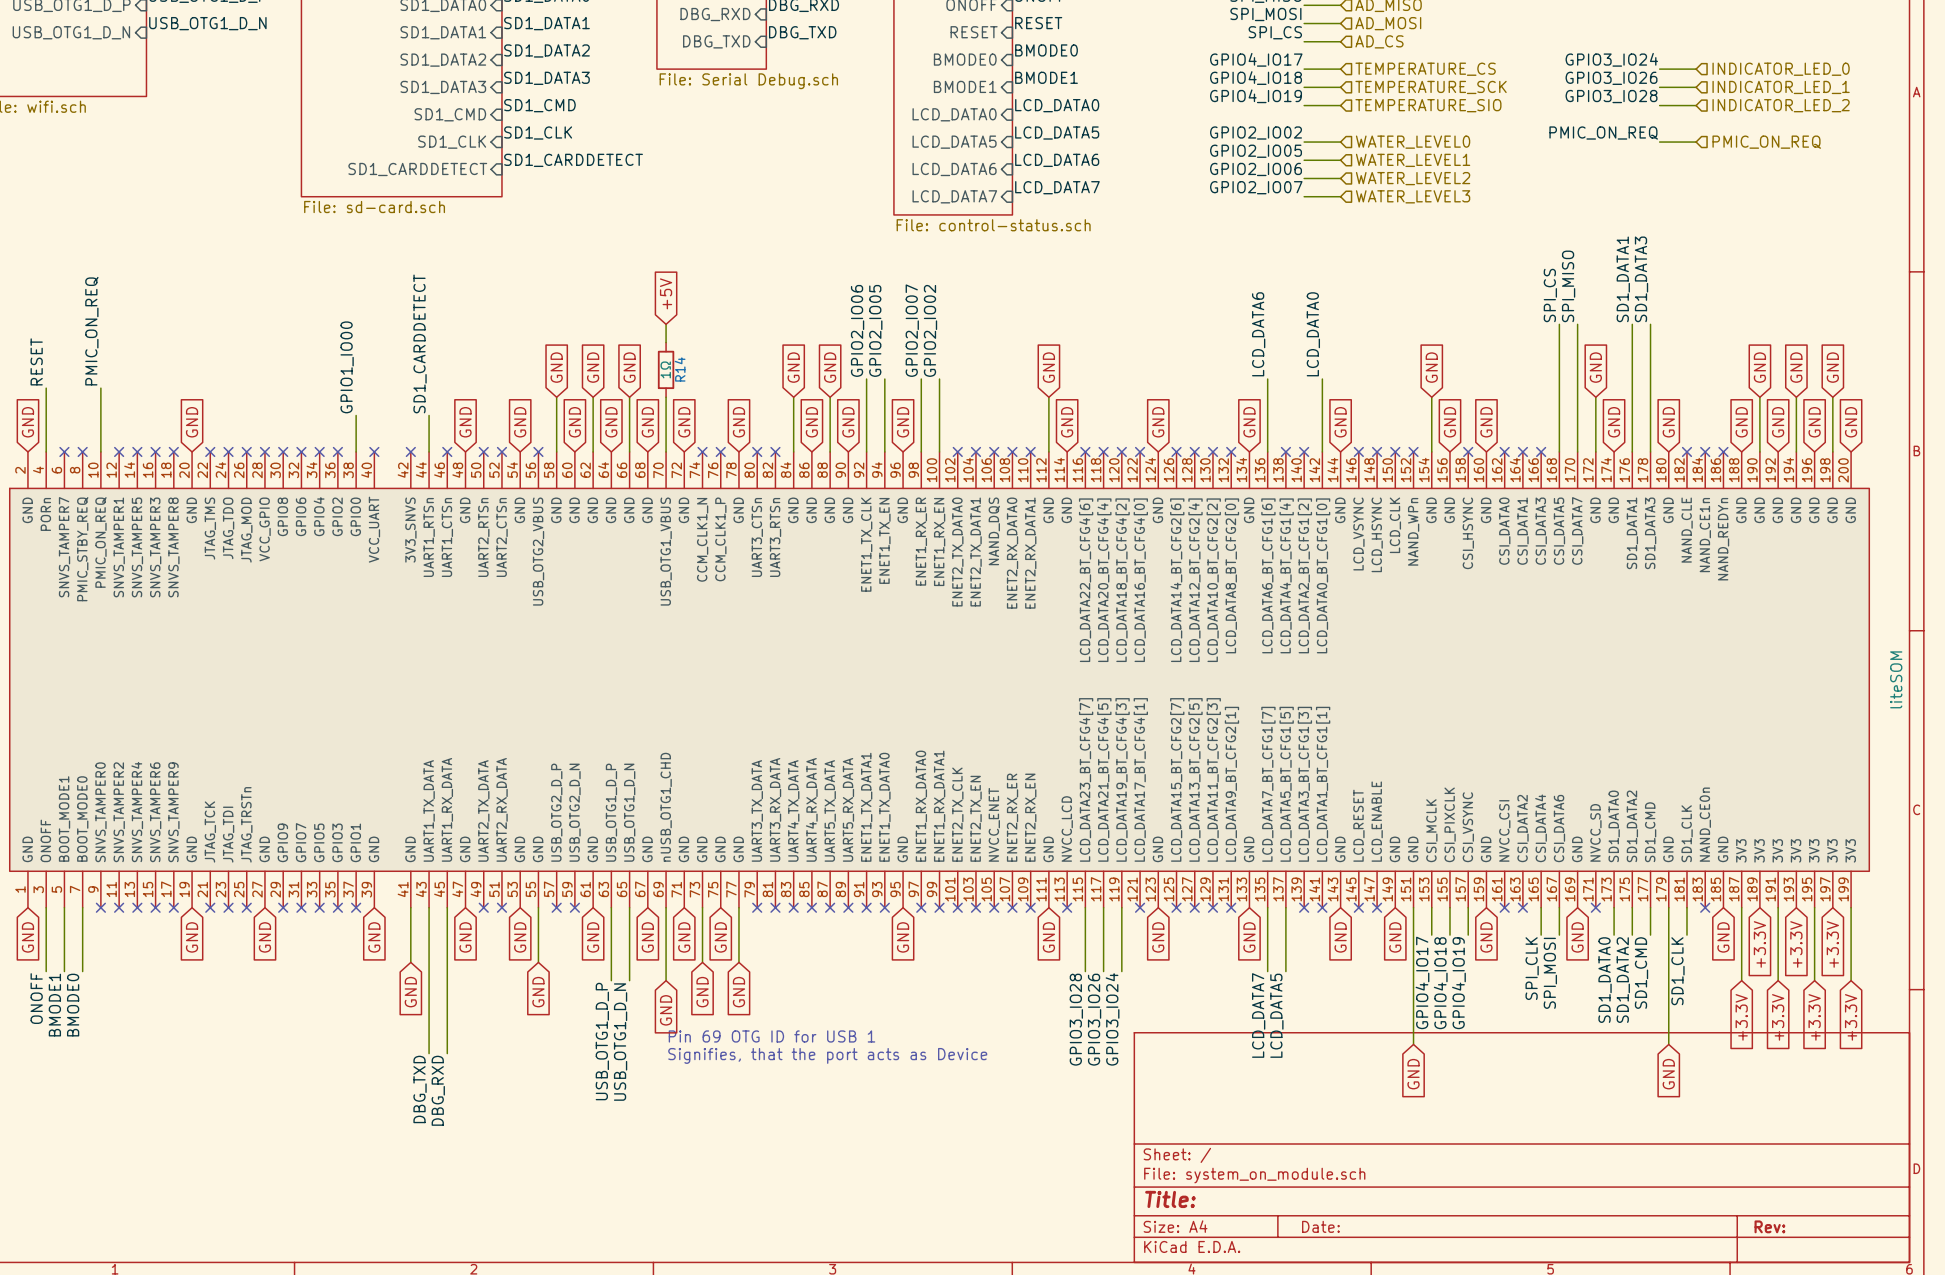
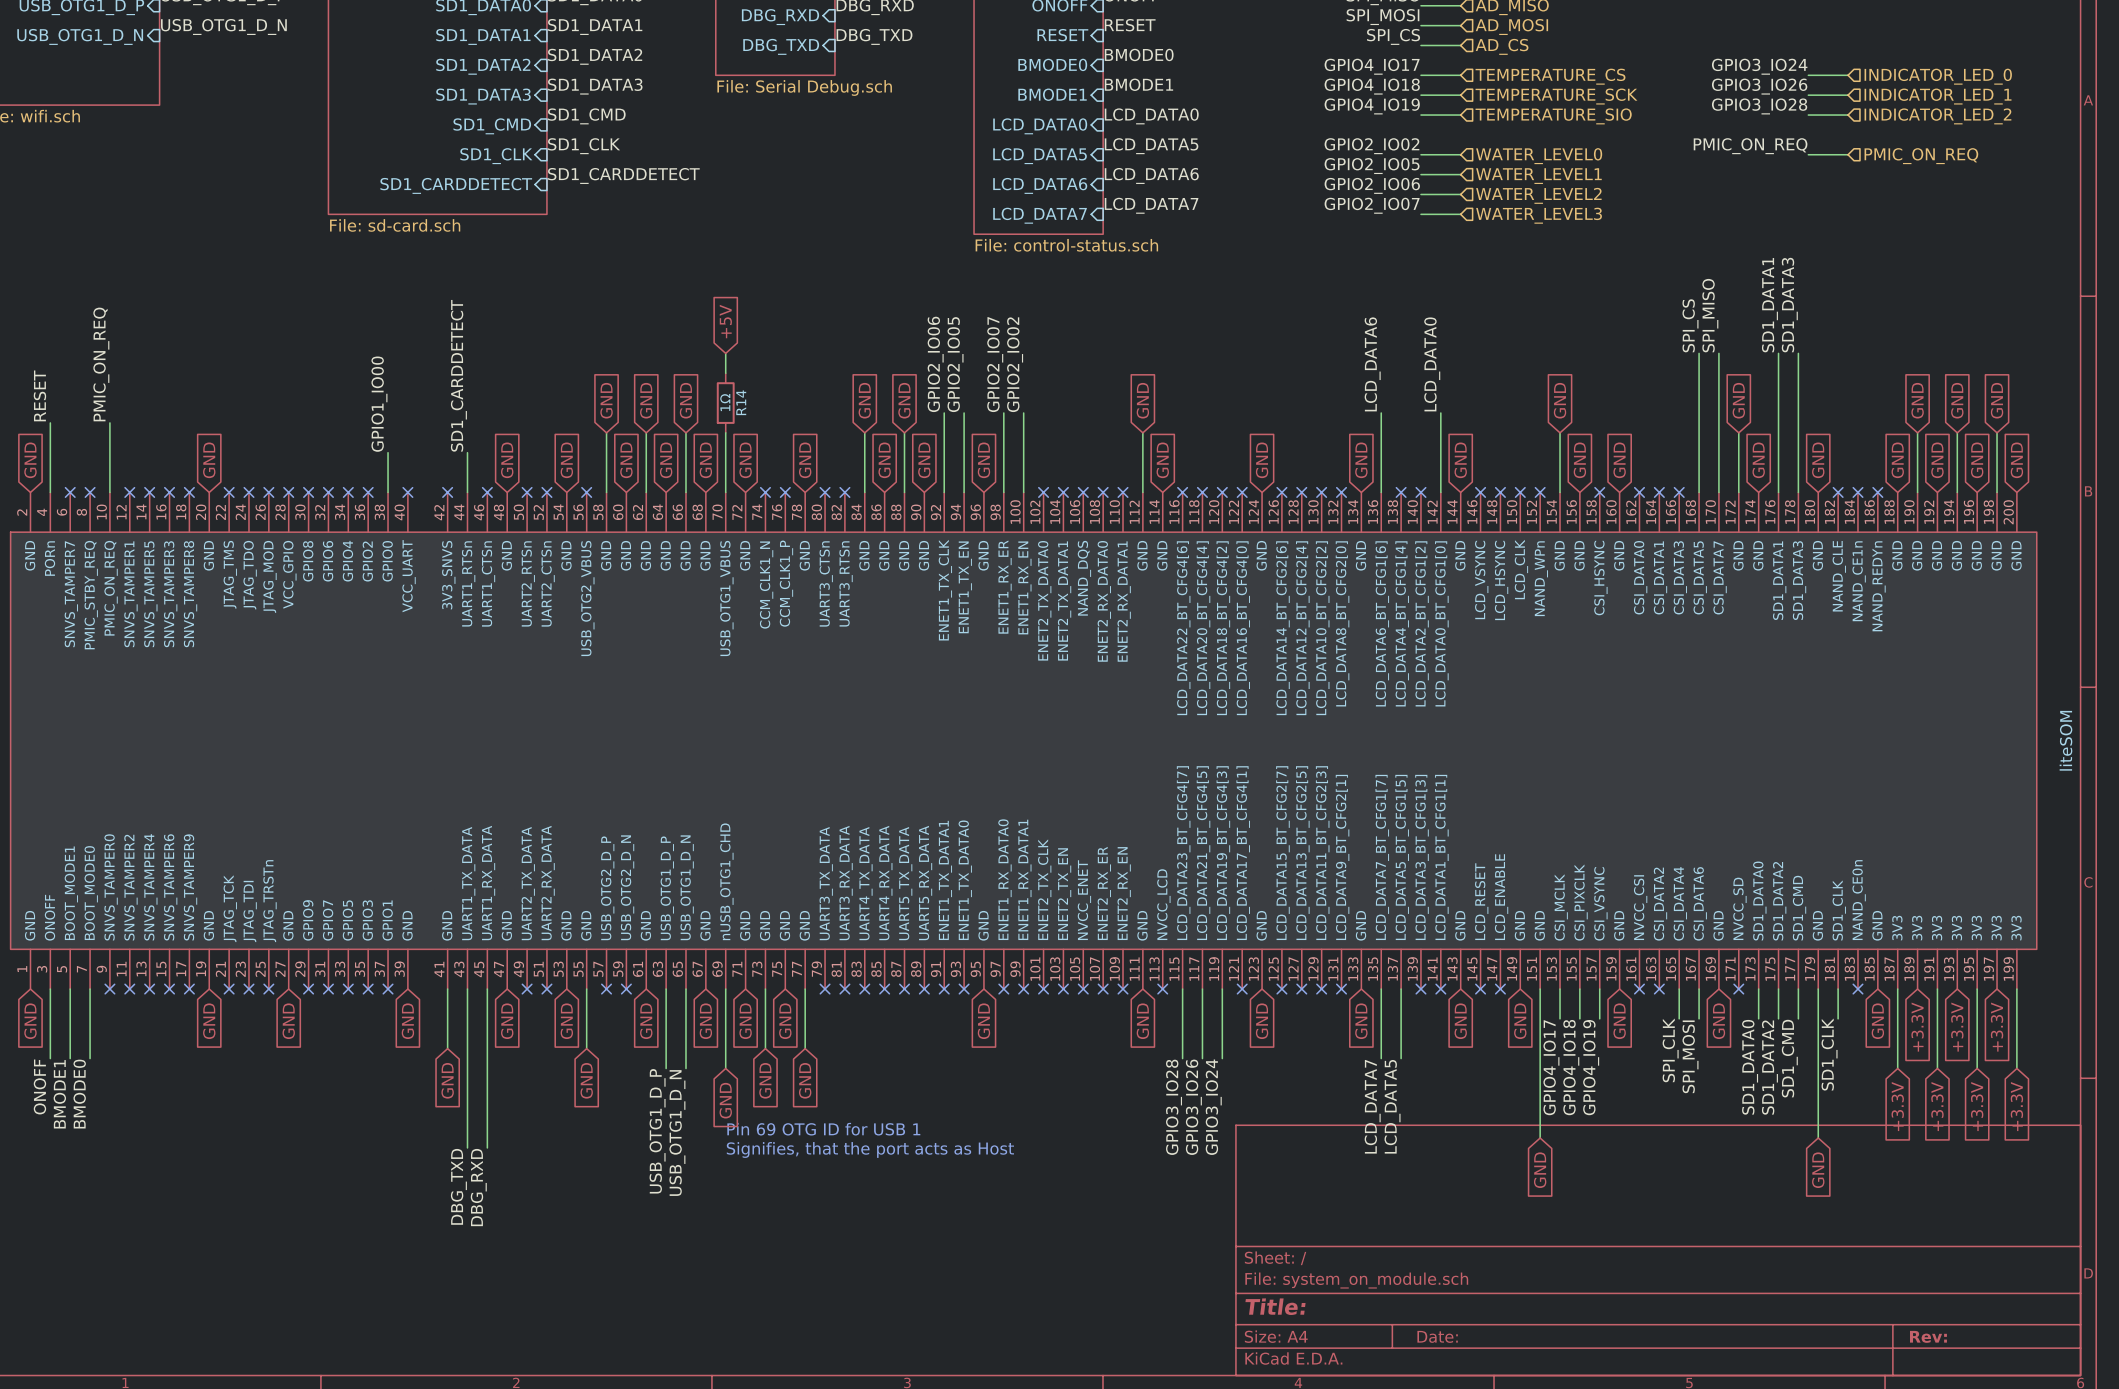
text: Signifies, that the port acts as Device (827, 1055) -> Signifies, that the port acts as Host (870, 1149)

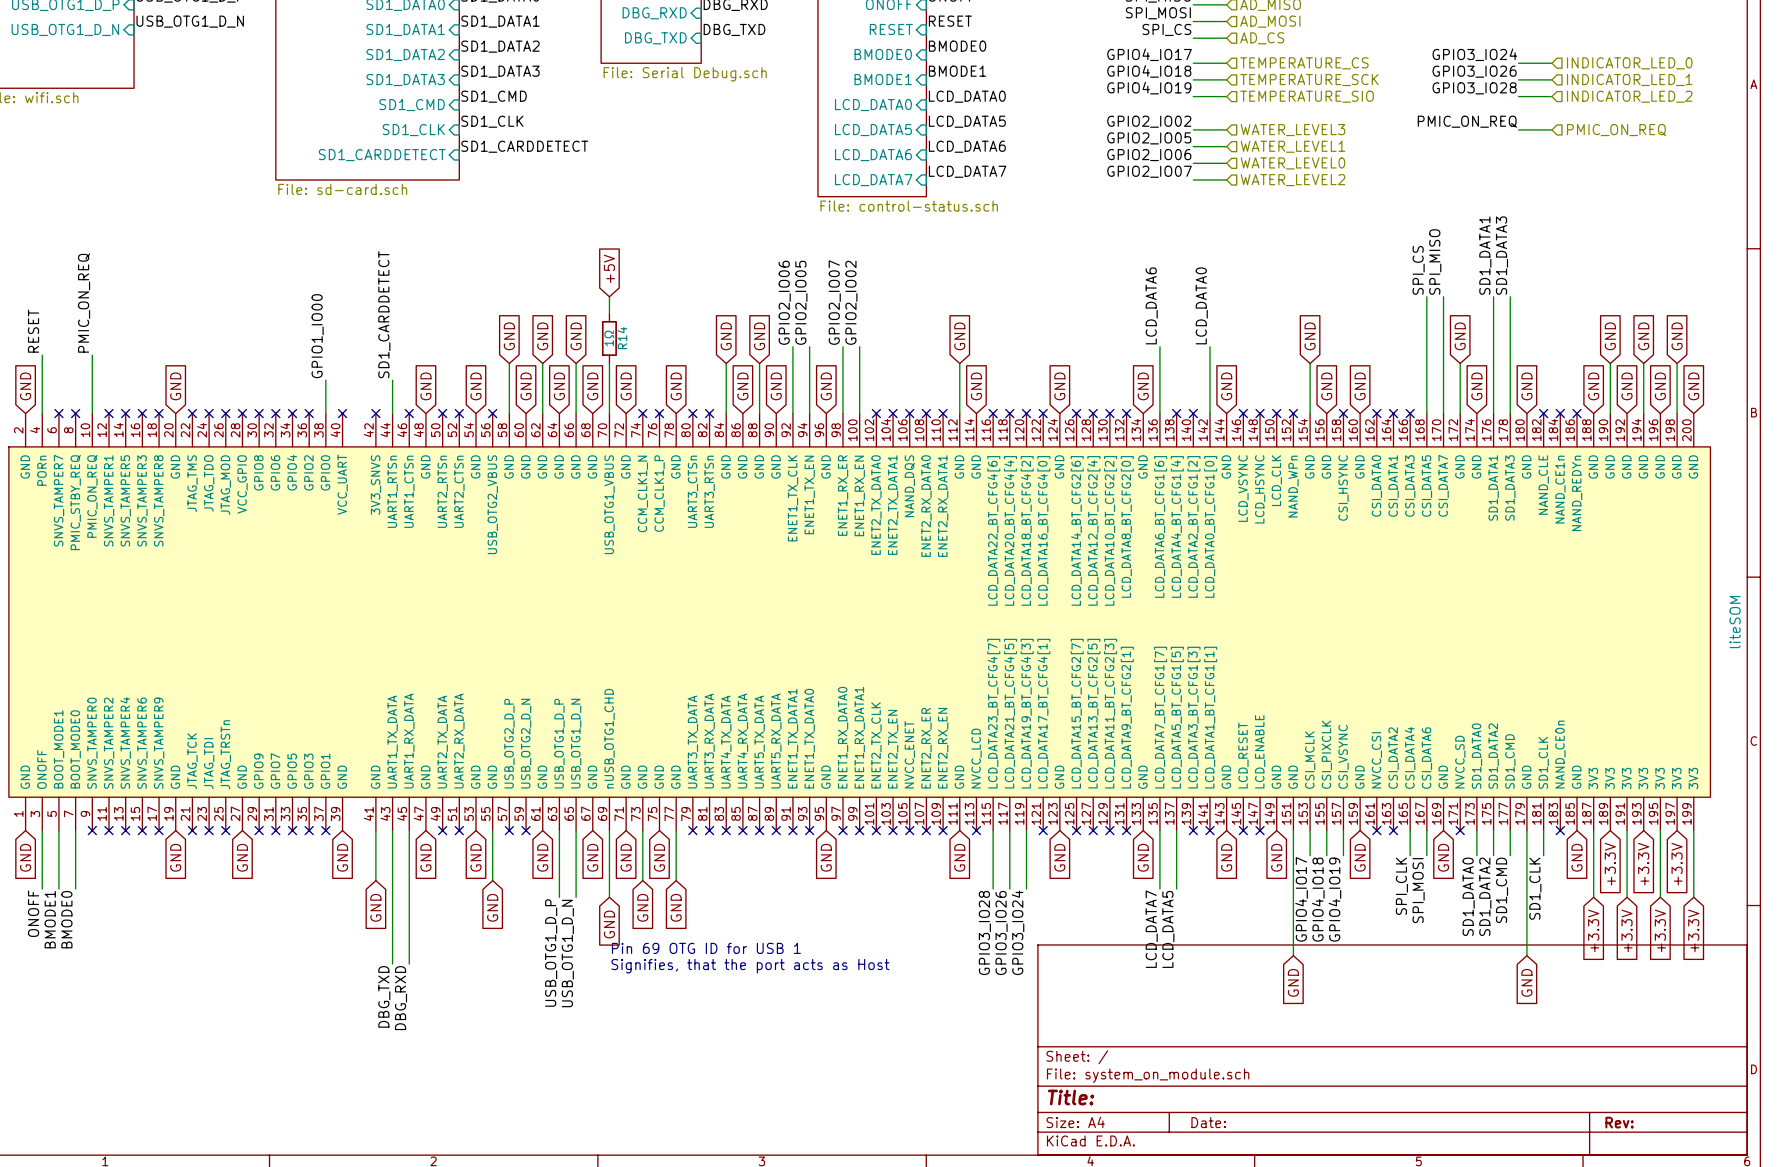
hierarchical label: WATER_LEVEL0 (1539, 156) -> WATER_LEVEL3 (1292, 130)
hierarchical label: WATER_LEVEL2 (1538, 195) -> WATER_LEVEL0 (1292, 163)
hierarchical label: WATER_LEVEL3 (1539, 215) -> WATER_LEVEL2 (1292, 180)

